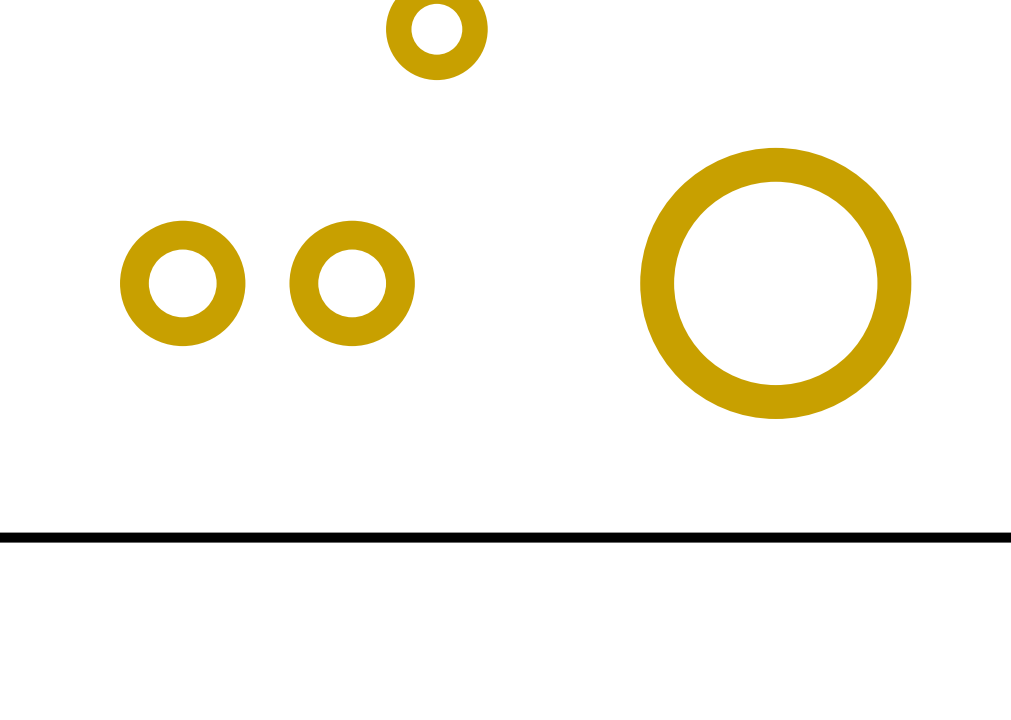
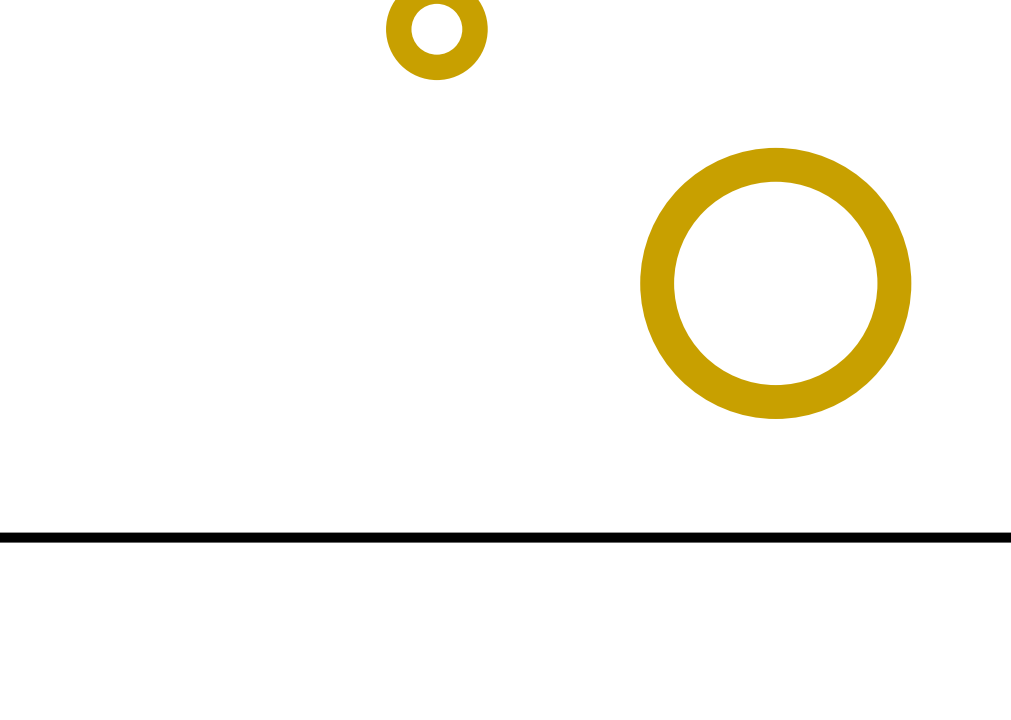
part: (267, 283) -> none

